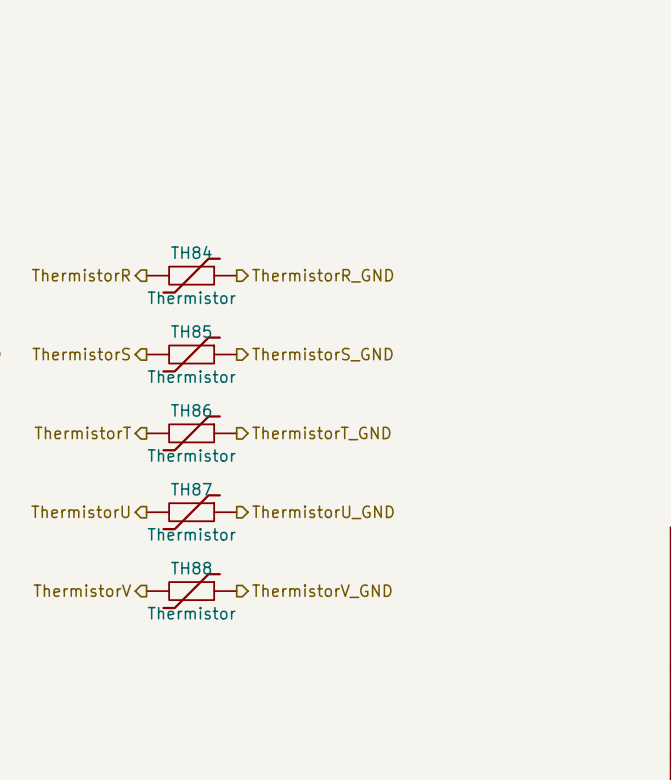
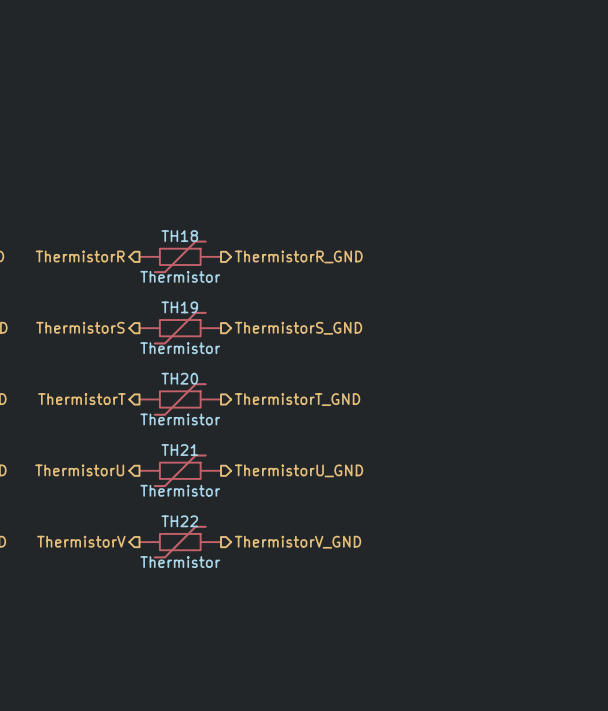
TH84 name: TH84 (191, 252) -> TH18 (179, 236)
TH85 name: TH85 (191, 331) -> TH19 (179, 307)
TH86 name: TH86 (191, 410) -> TH20 (179, 378)
TH87 name: TH87 (191, 489) -> TH21 (179, 450)
TH88 name: TH88 (191, 568) -> TH22 (179, 521)

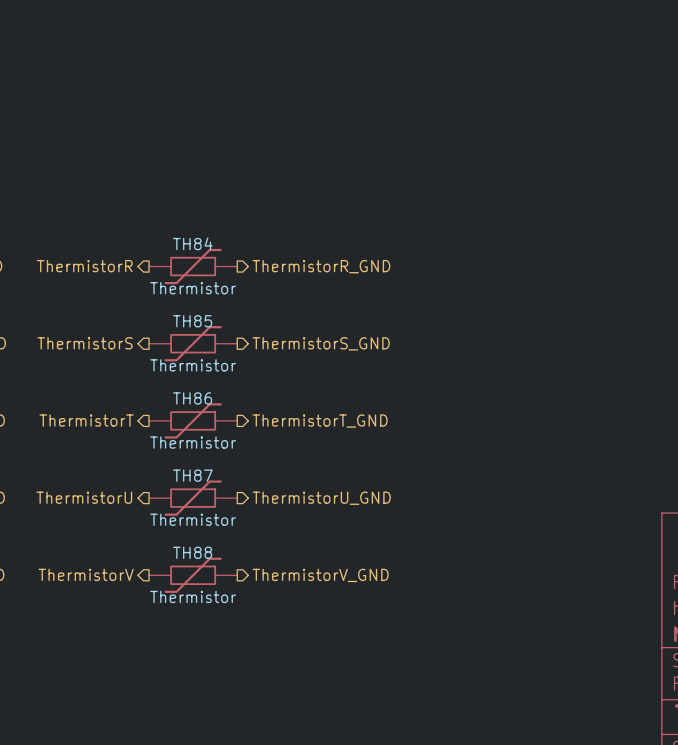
TH18 name: TH18 (179, 236) -> TH84 (192, 243)
TH19 name: TH19 (179, 307) -> TH85 (192, 321)
TH20 name: TH20 (179, 378) -> TH86 (192, 398)
TH21 name: TH21 (179, 450) -> TH87 (192, 475)
TH22 name: TH22 (179, 521) -> TH88 (192, 552)

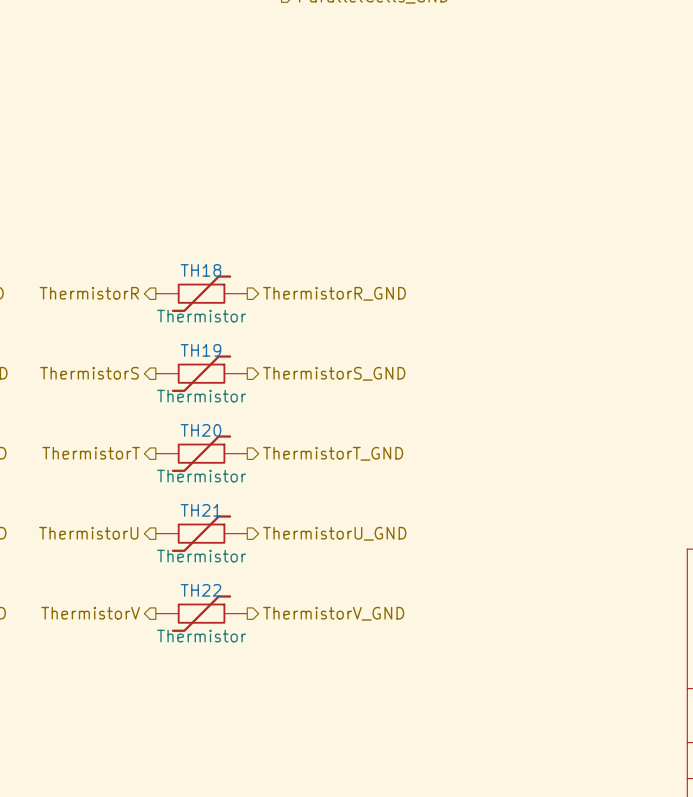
TH84 name: TH84 (192, 243) -> TH18 (201, 270)
TH85 name: TH85 (192, 321) -> TH19 (201, 350)
TH86 name: TH86 (192, 398) -> TH20 (201, 430)
TH87 name: TH87 (192, 475) -> TH21 (201, 510)
TH88 name: TH88 (192, 552) -> TH22 (201, 590)

